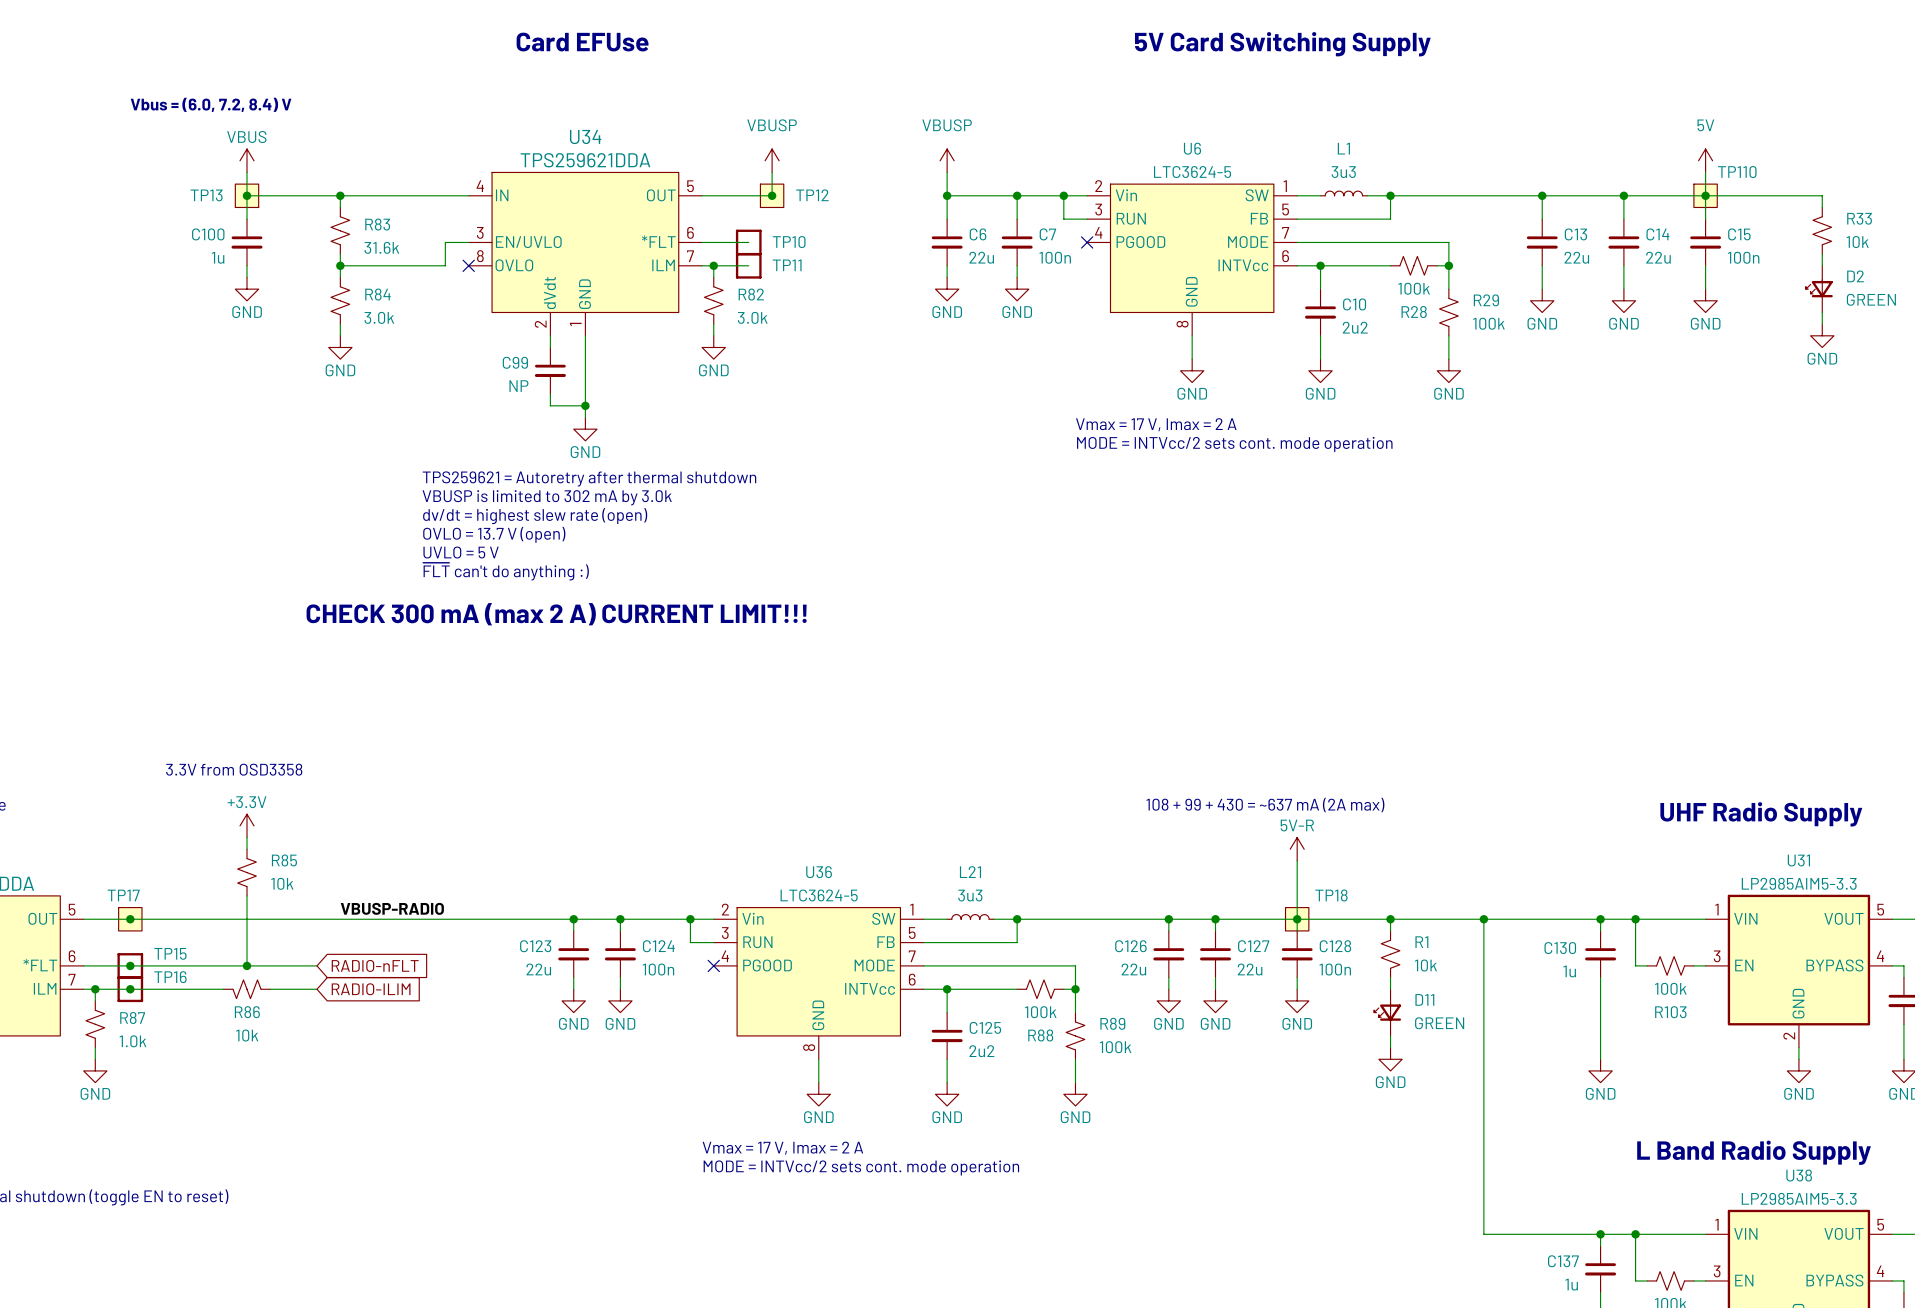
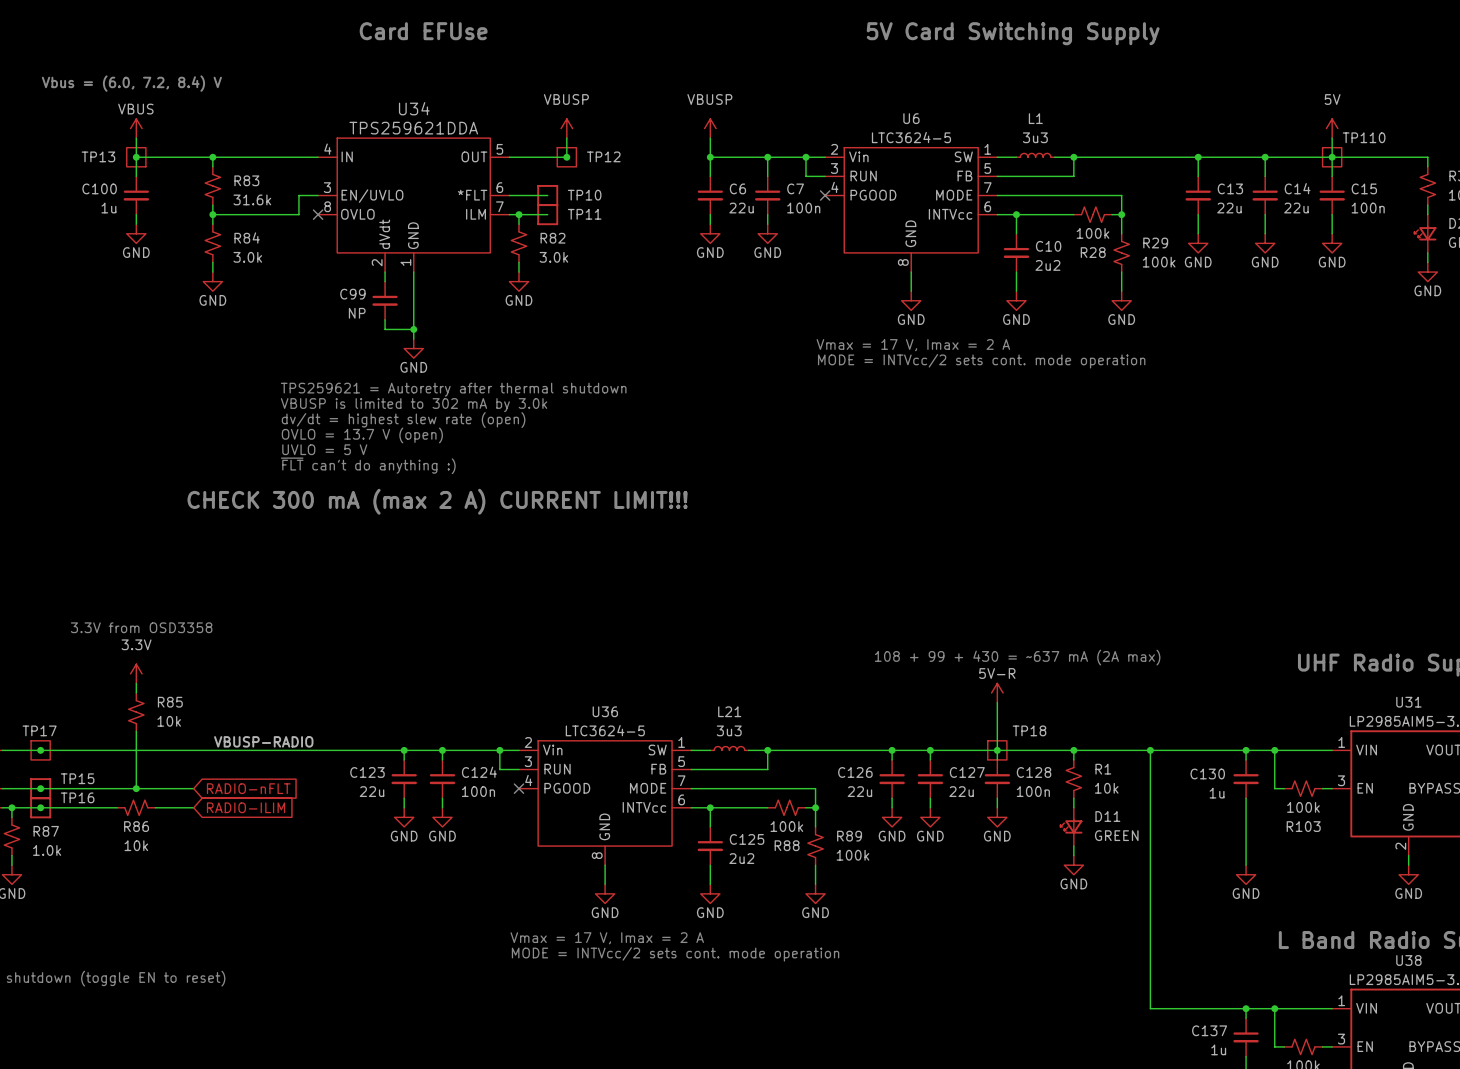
power symbol: +3.3V (247, 825) -> 3.3V (136, 673)

